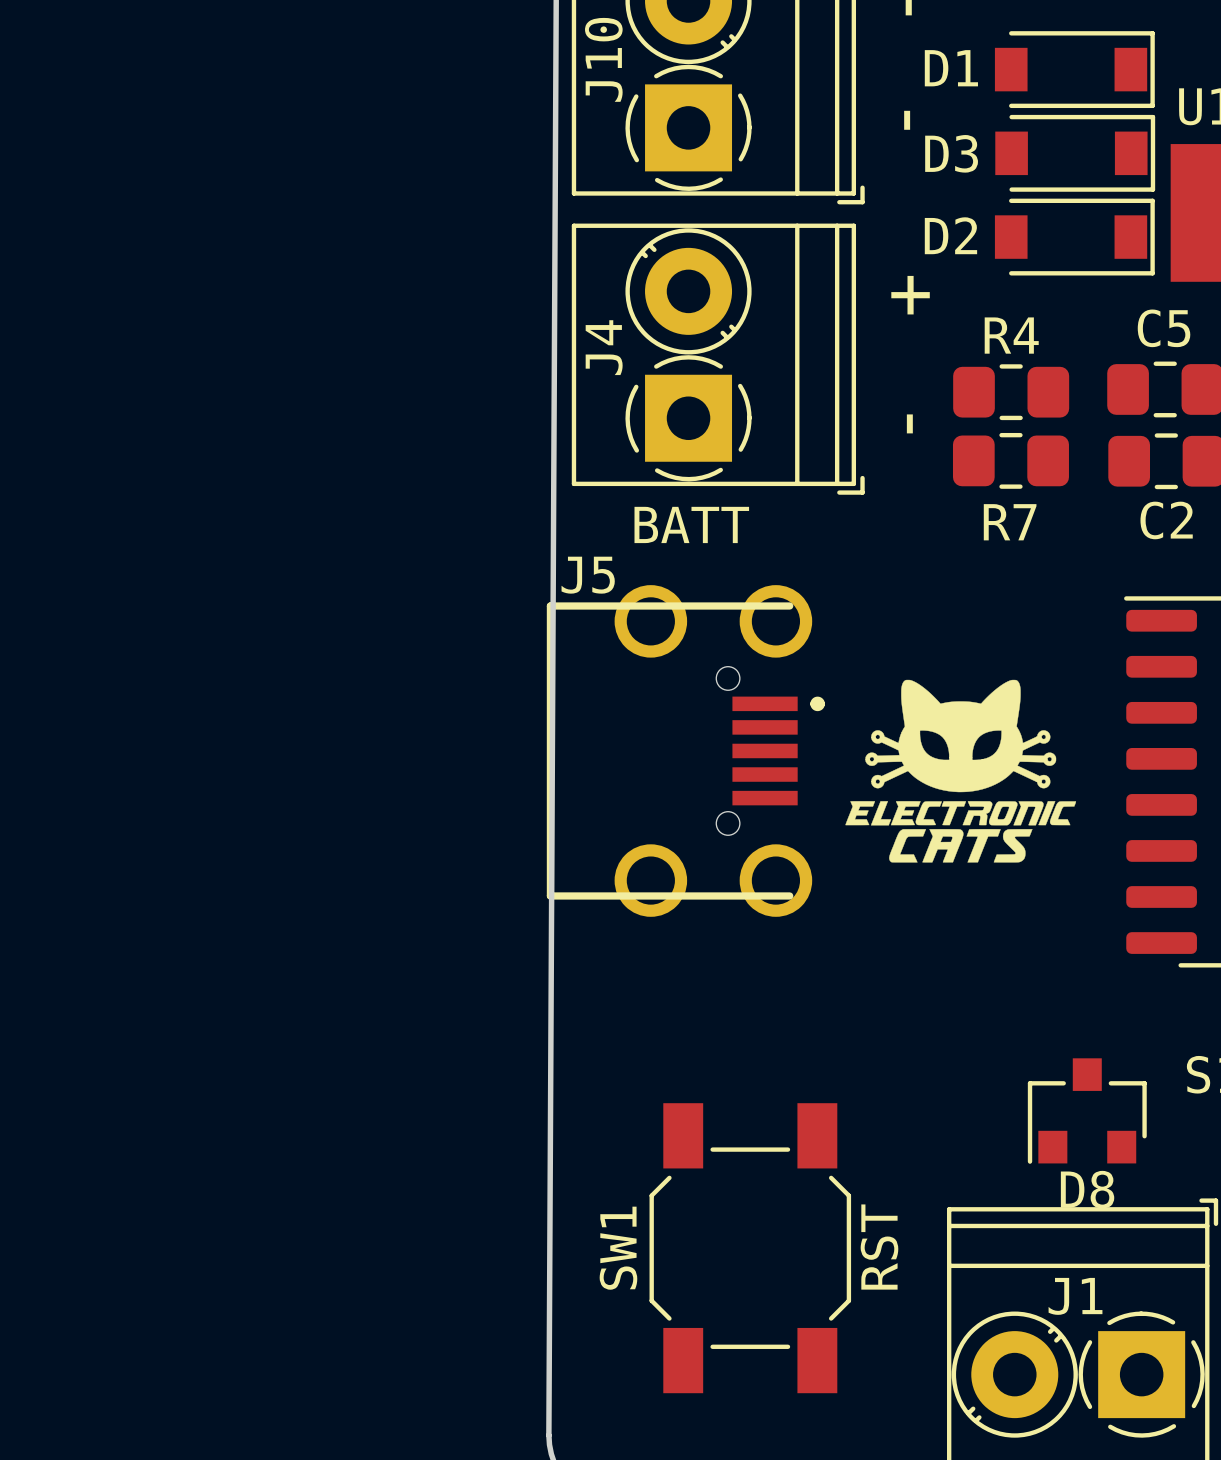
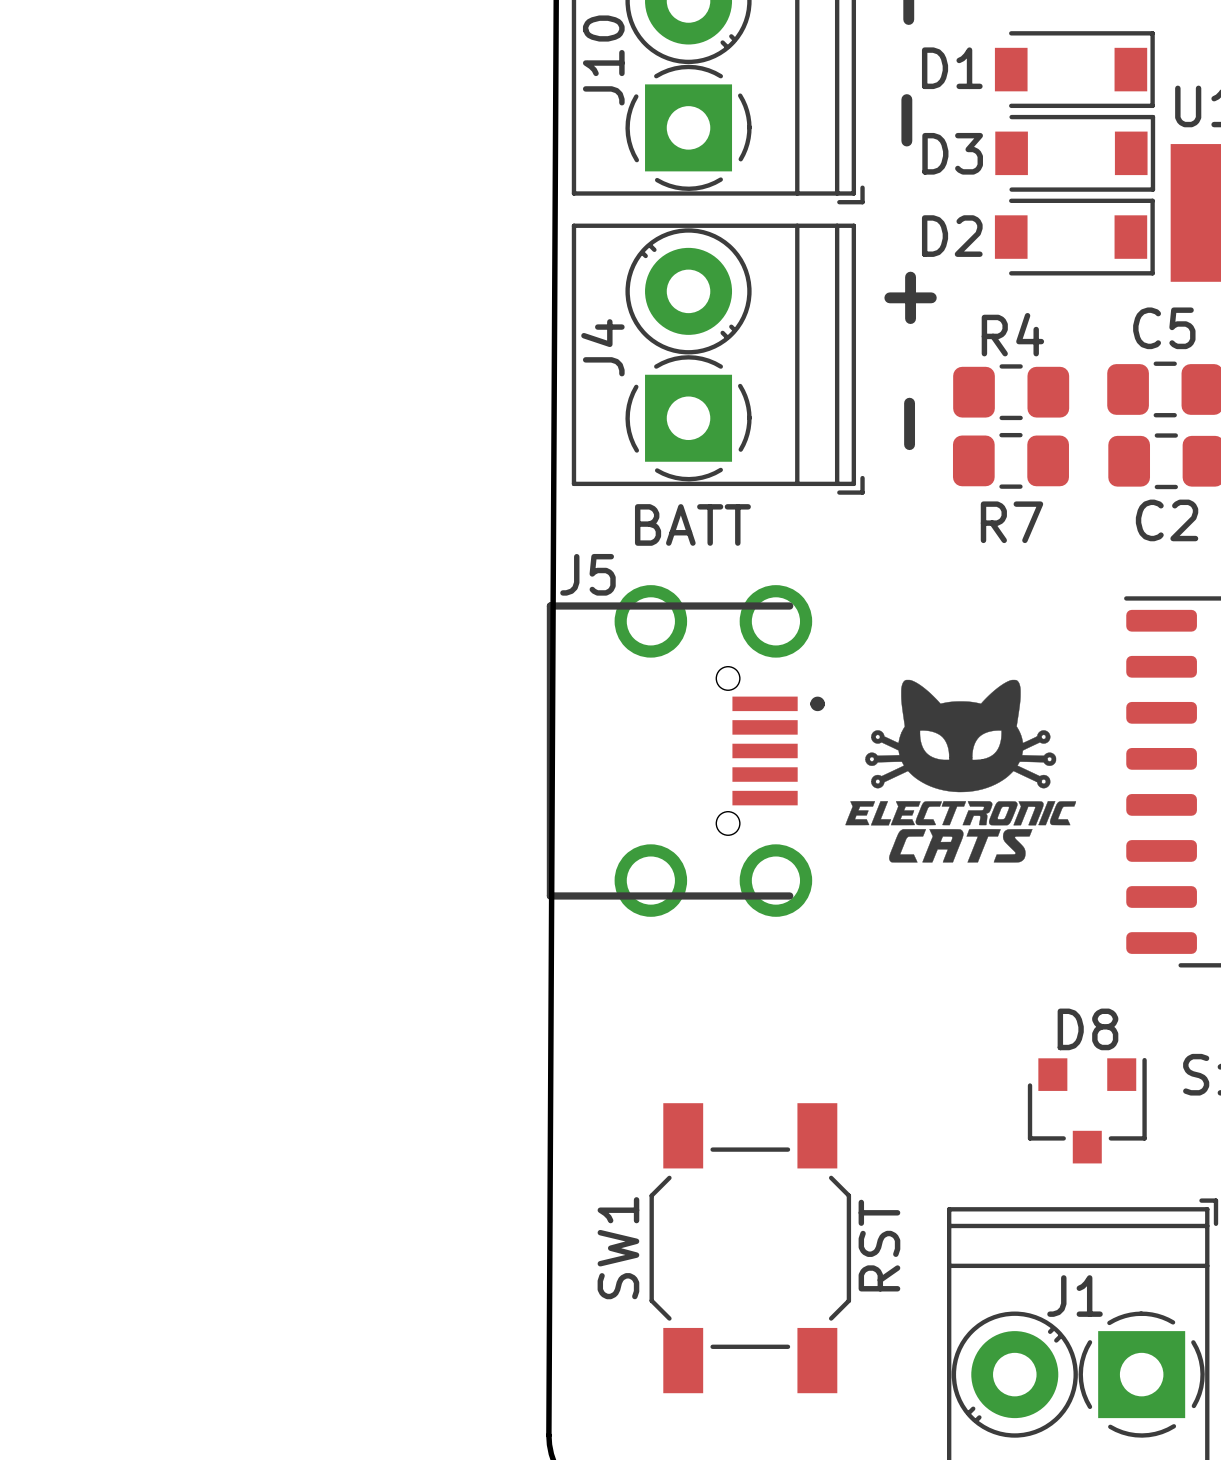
D8 rotation: 0° (1087, 1111) -> 180° (1087, 1110)

